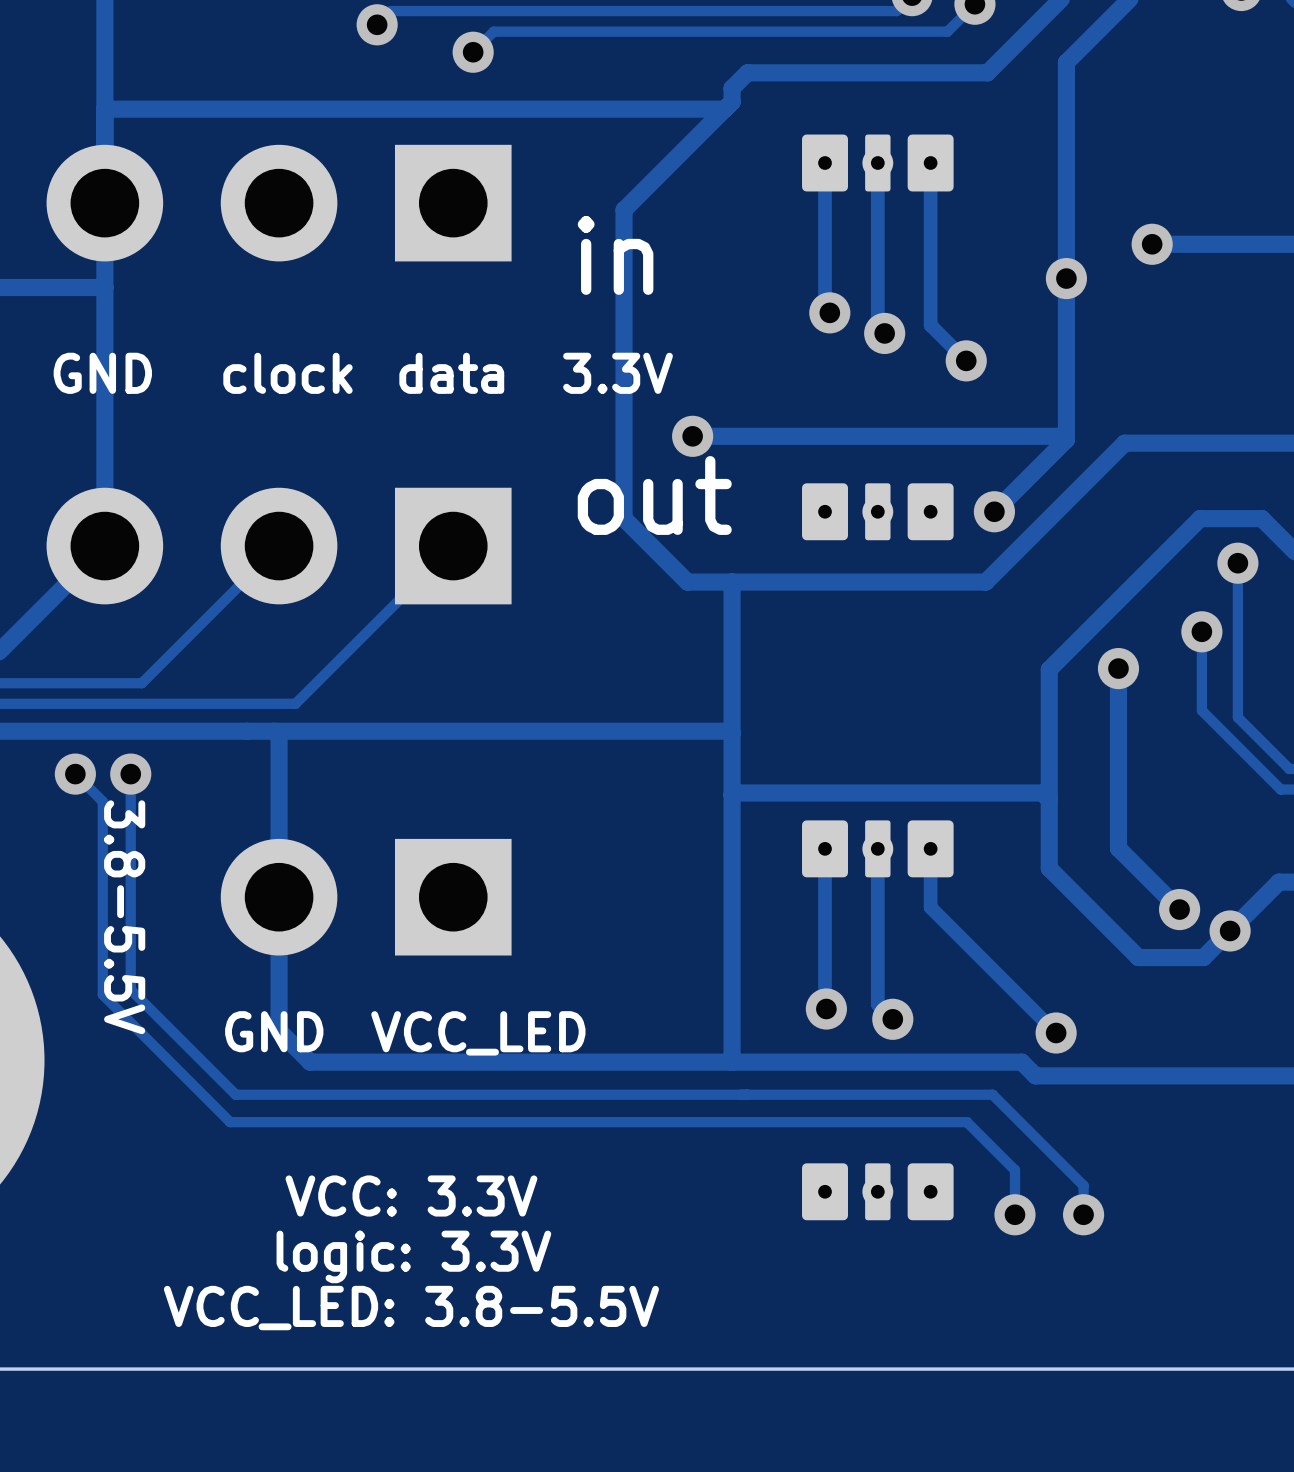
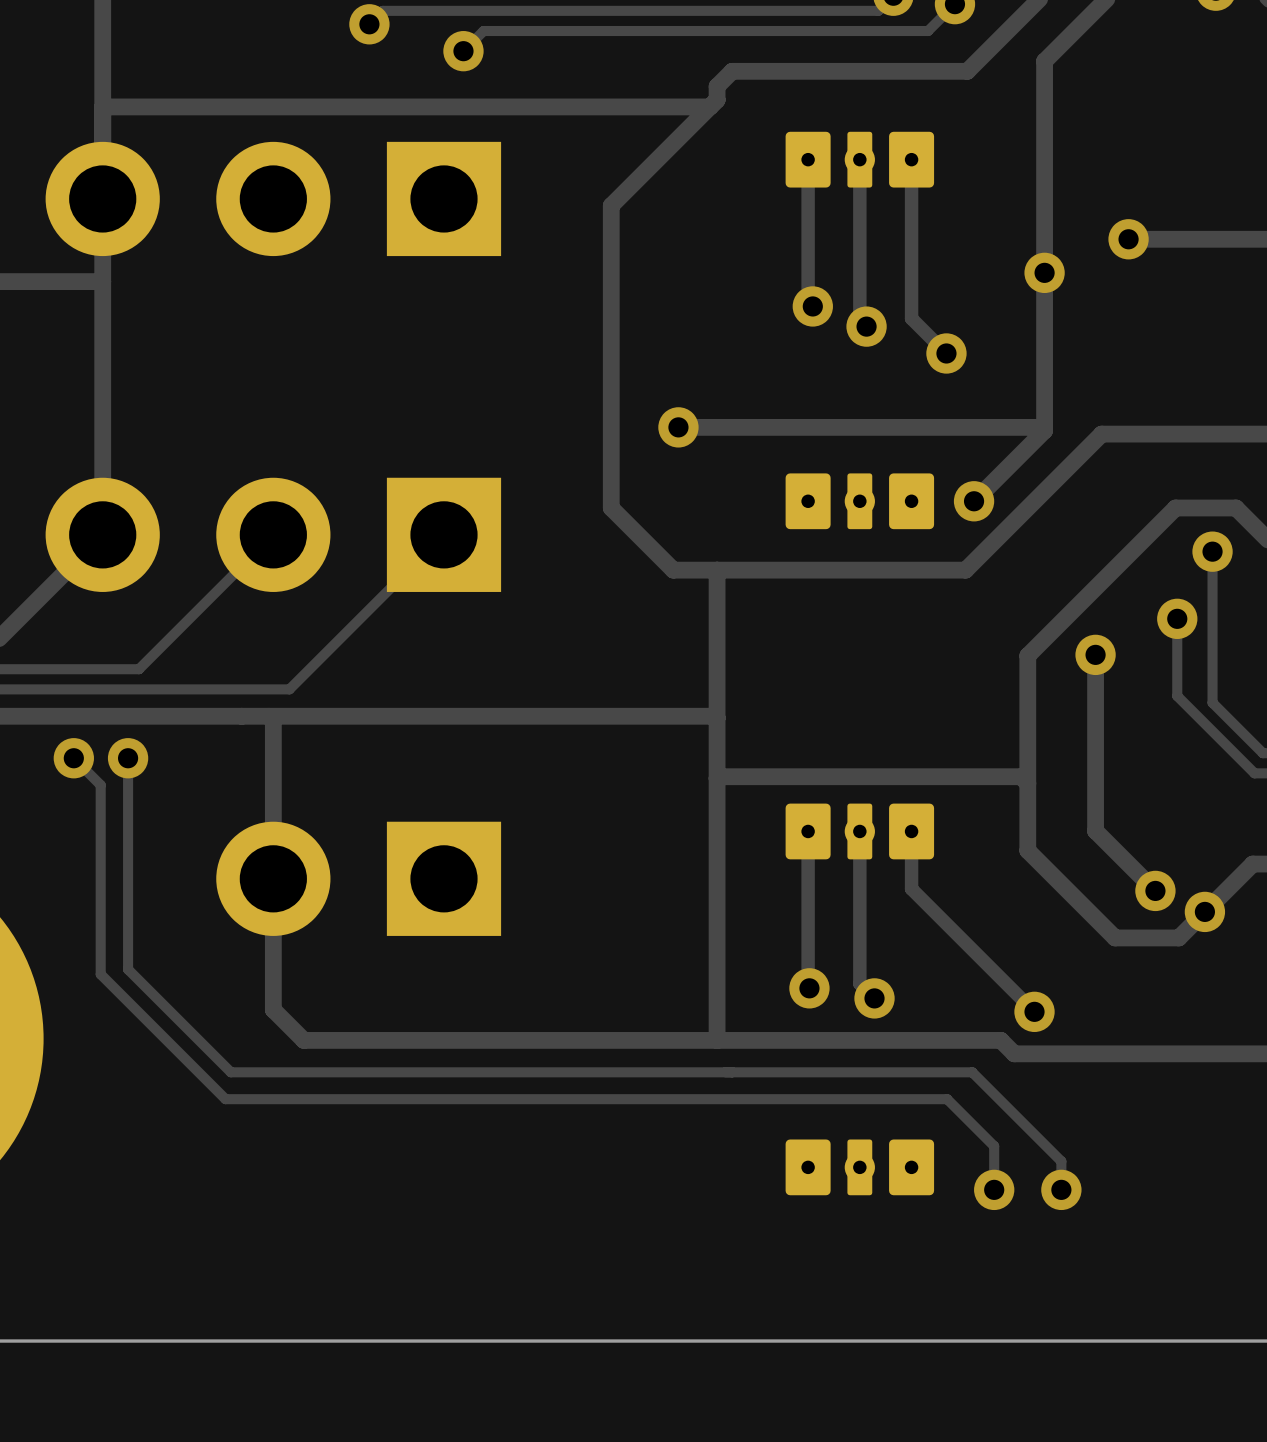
text: in (615, 255) -> none
text: GND (102, 373) -> none
text: clock (287, 373) -> none
text: data (451, 373) -> none
text: 3.3V (618, 373) -> none
text: out (654, 495) -> none
text: 3.8-5.5V (124, 917) -> none
text: GND (274, 1031) -> none
text: VCC_LED (478, 1033) -> none
text: VCC: 3.3V (411, 1195) -> none
text: logic: 3.3V (413, 1256) -> none
text: VCC_LED: 3.8-5.5V (411, 1308) -> none

